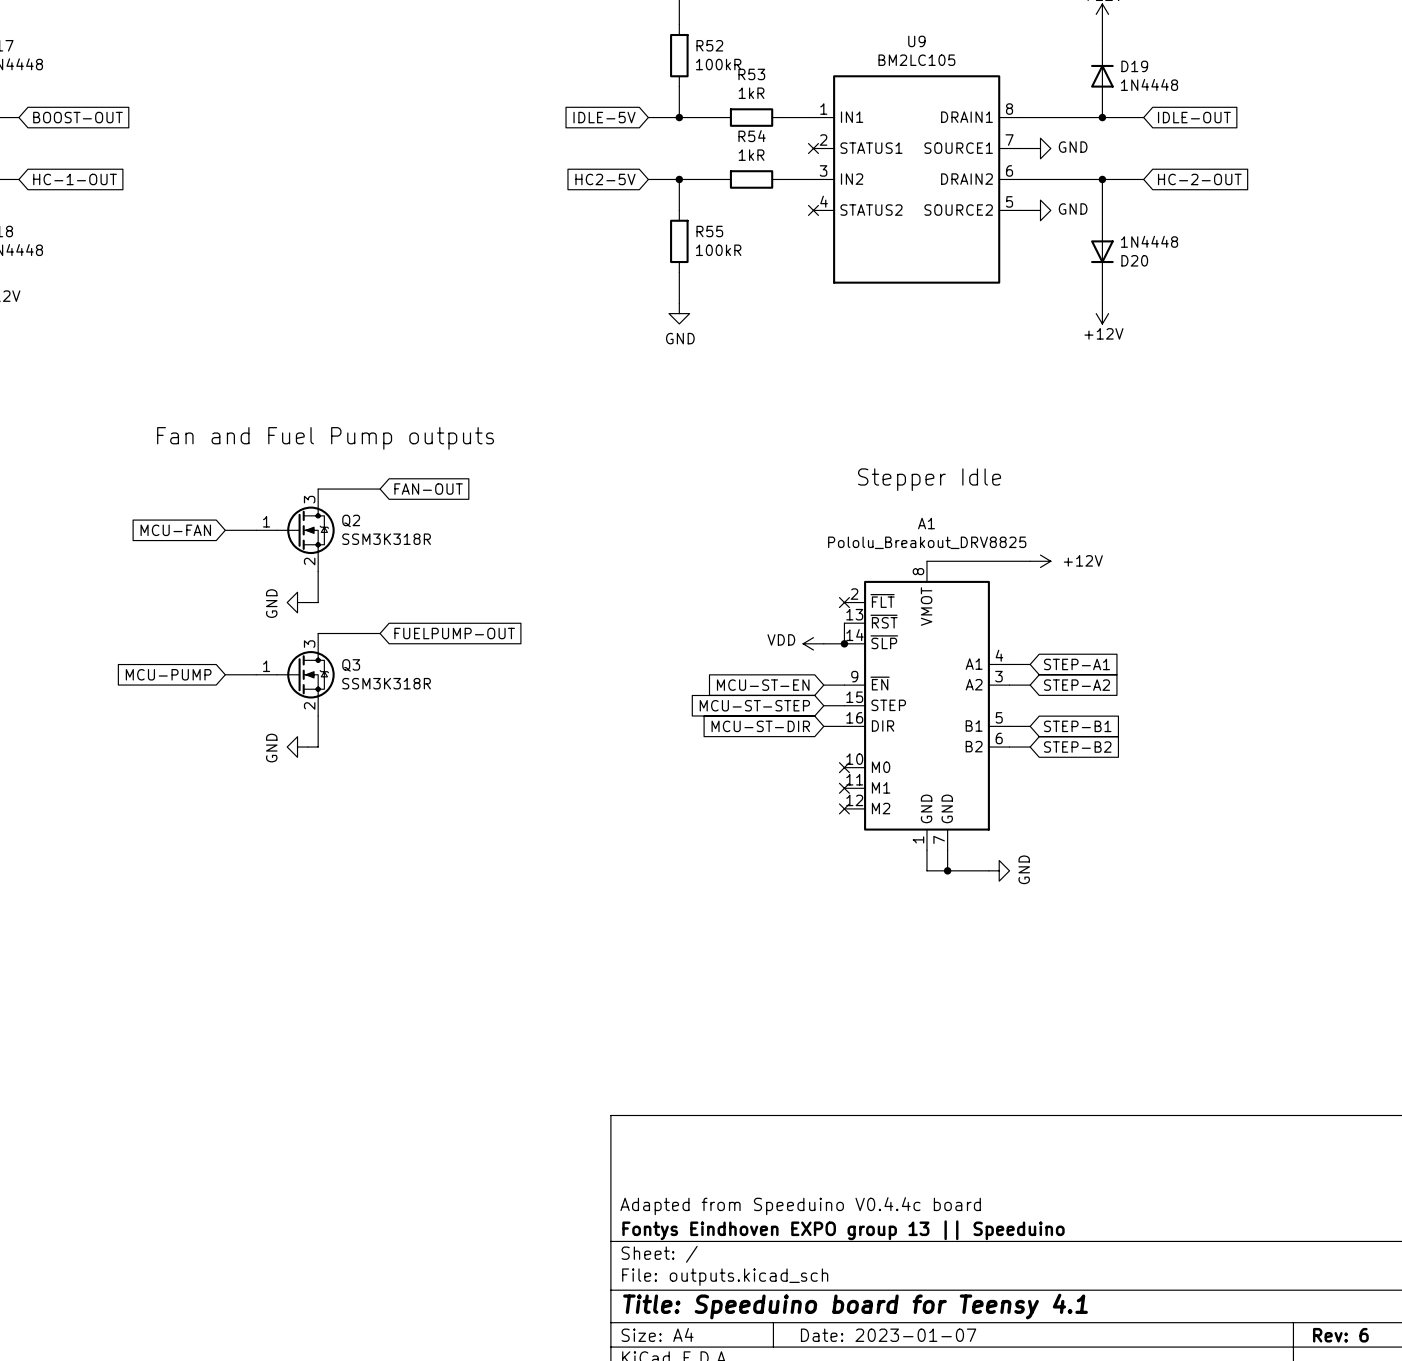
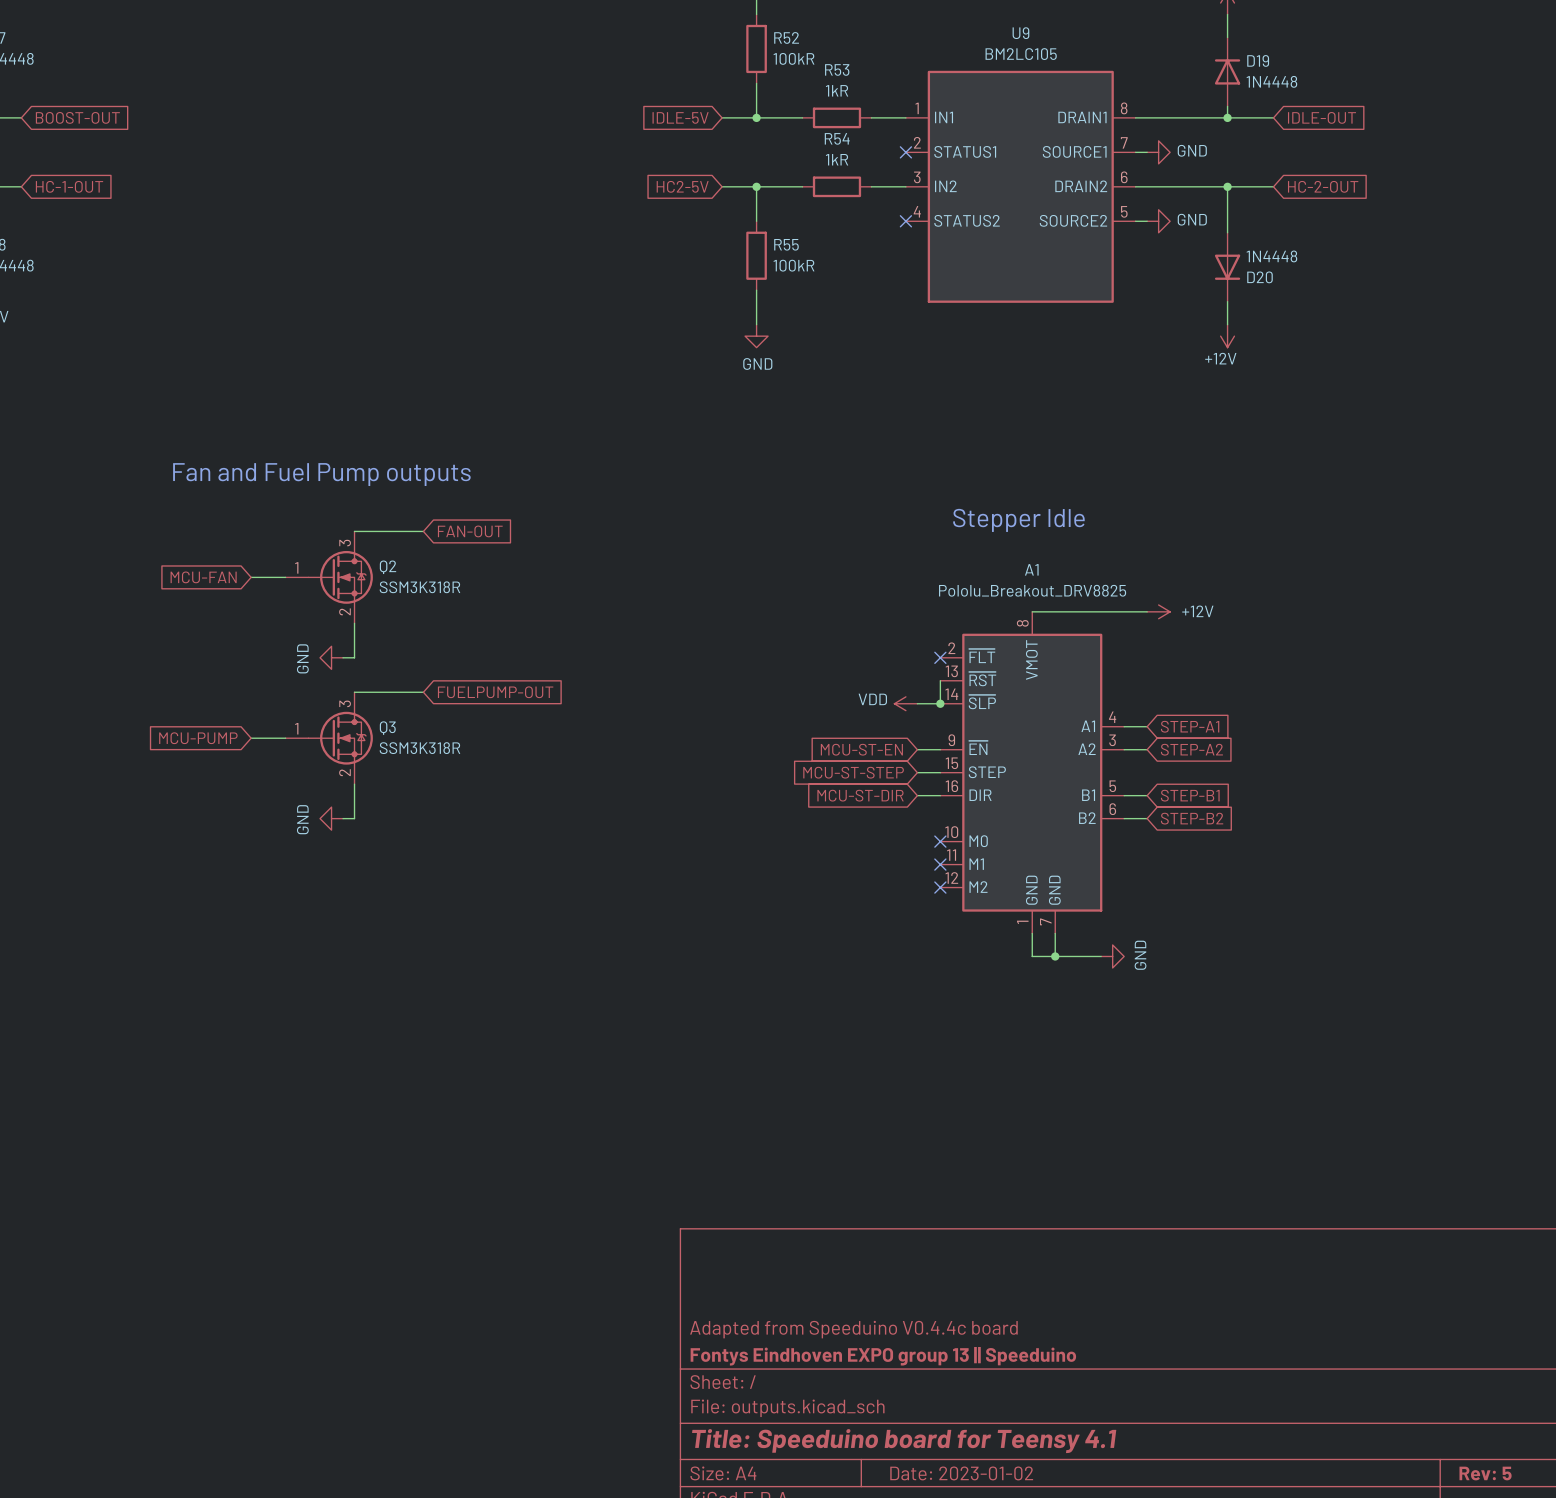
title block: Date: 2023-01-07 (888, 1335) -> Date: 2023-01-02 (961, 1473)
title block: Rev: 6 (1340, 1335) -> Rev: 5 (1485, 1473)

